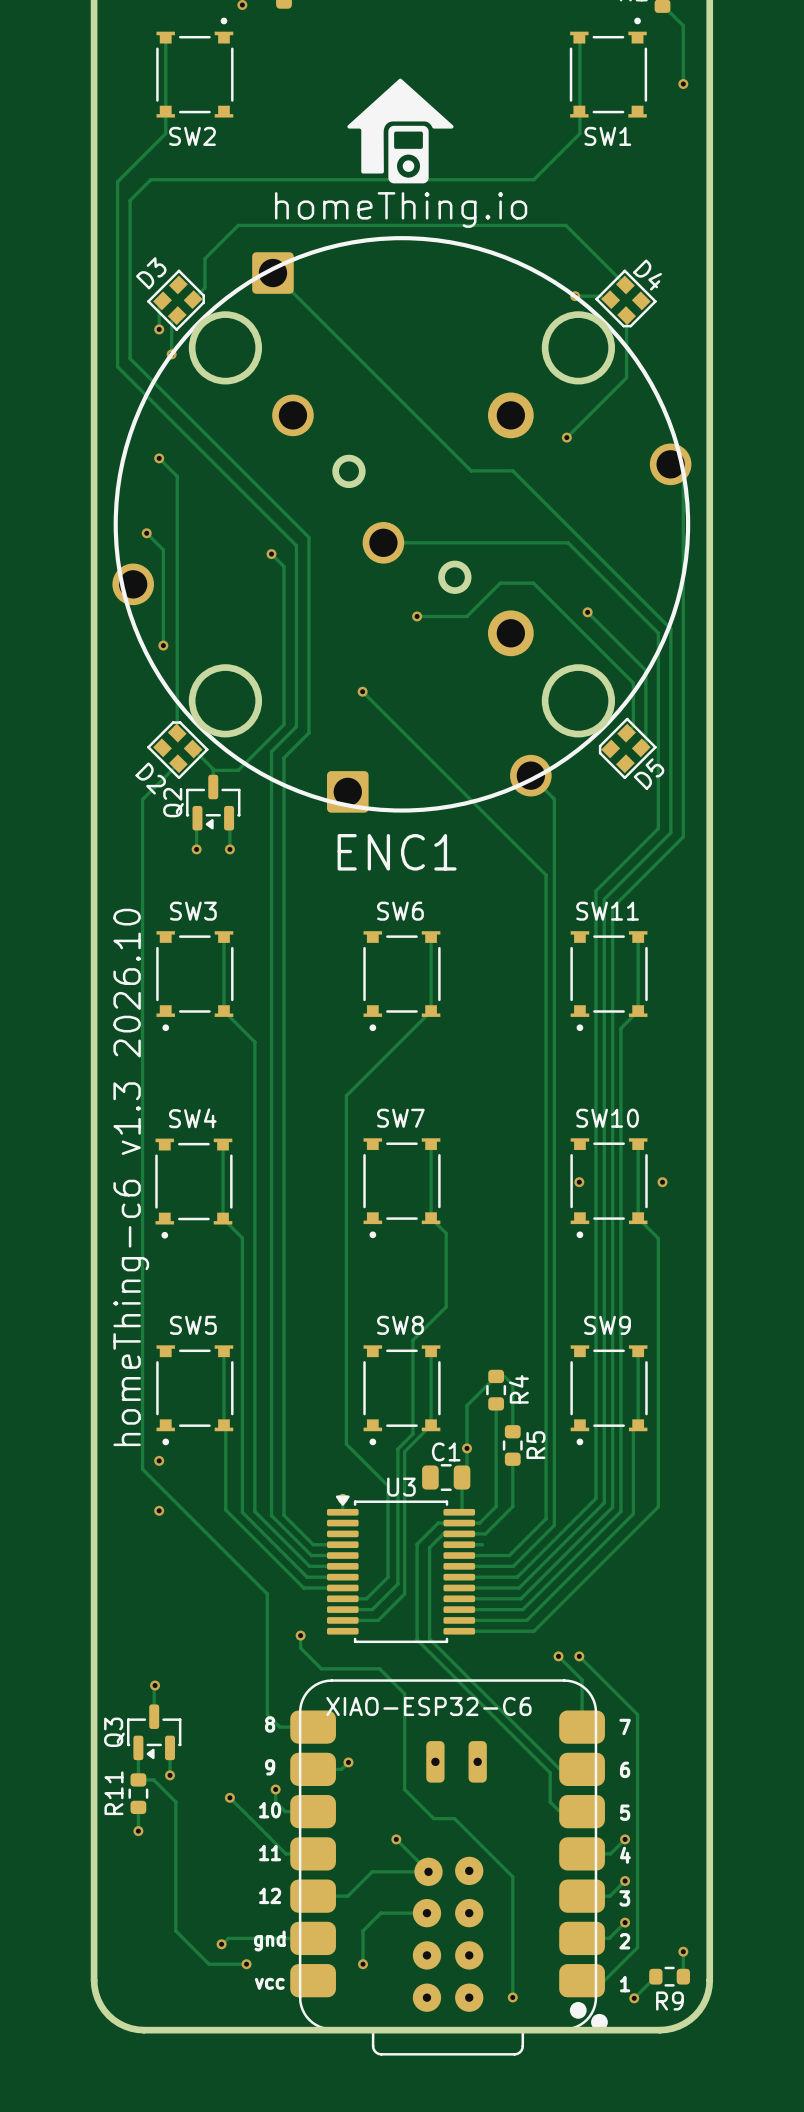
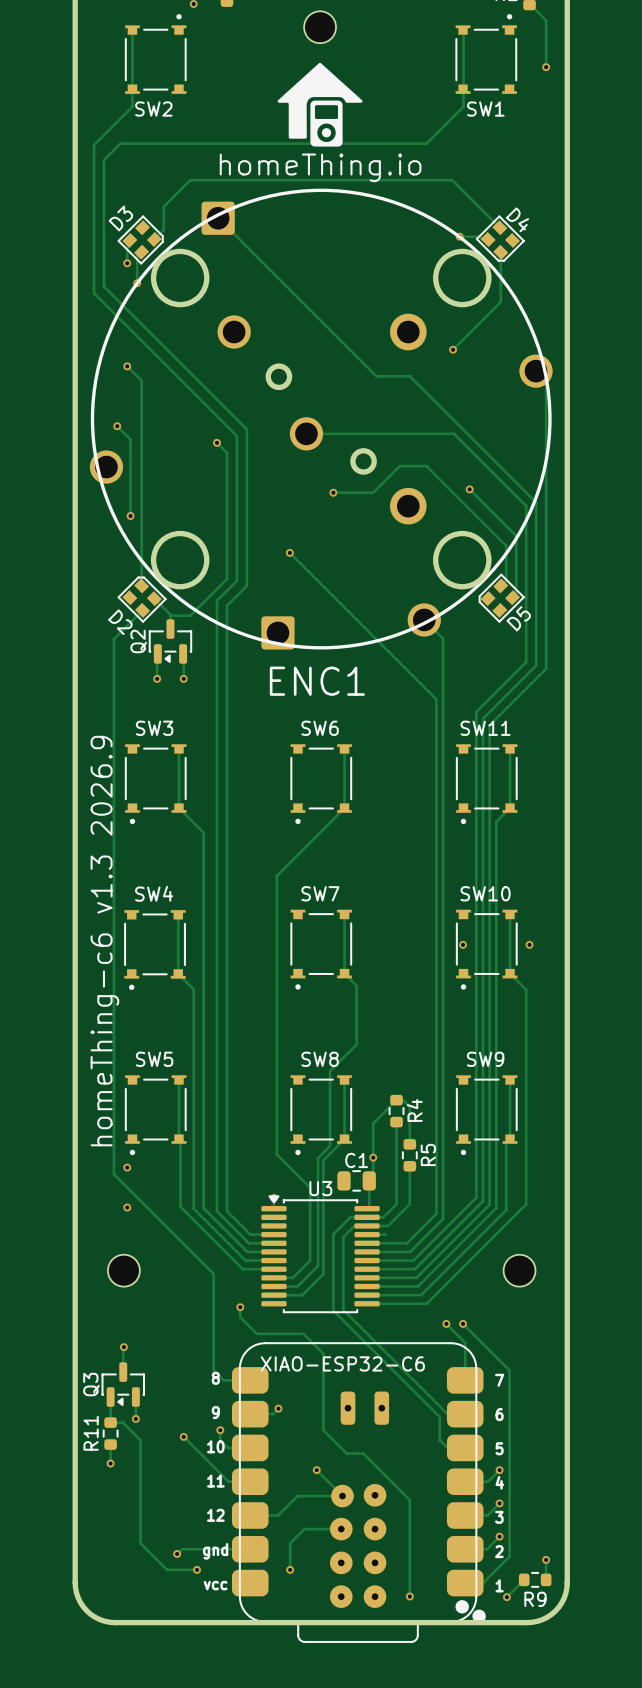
part: none -> (320, 27)
text: homeThing-c6 v1.3 2026.10 (131, 1177) -> homeThing-c6 v1.3 2026.9 (104, 941)
part: none -> (123, 1270)
part: none -> (519, 1270)

